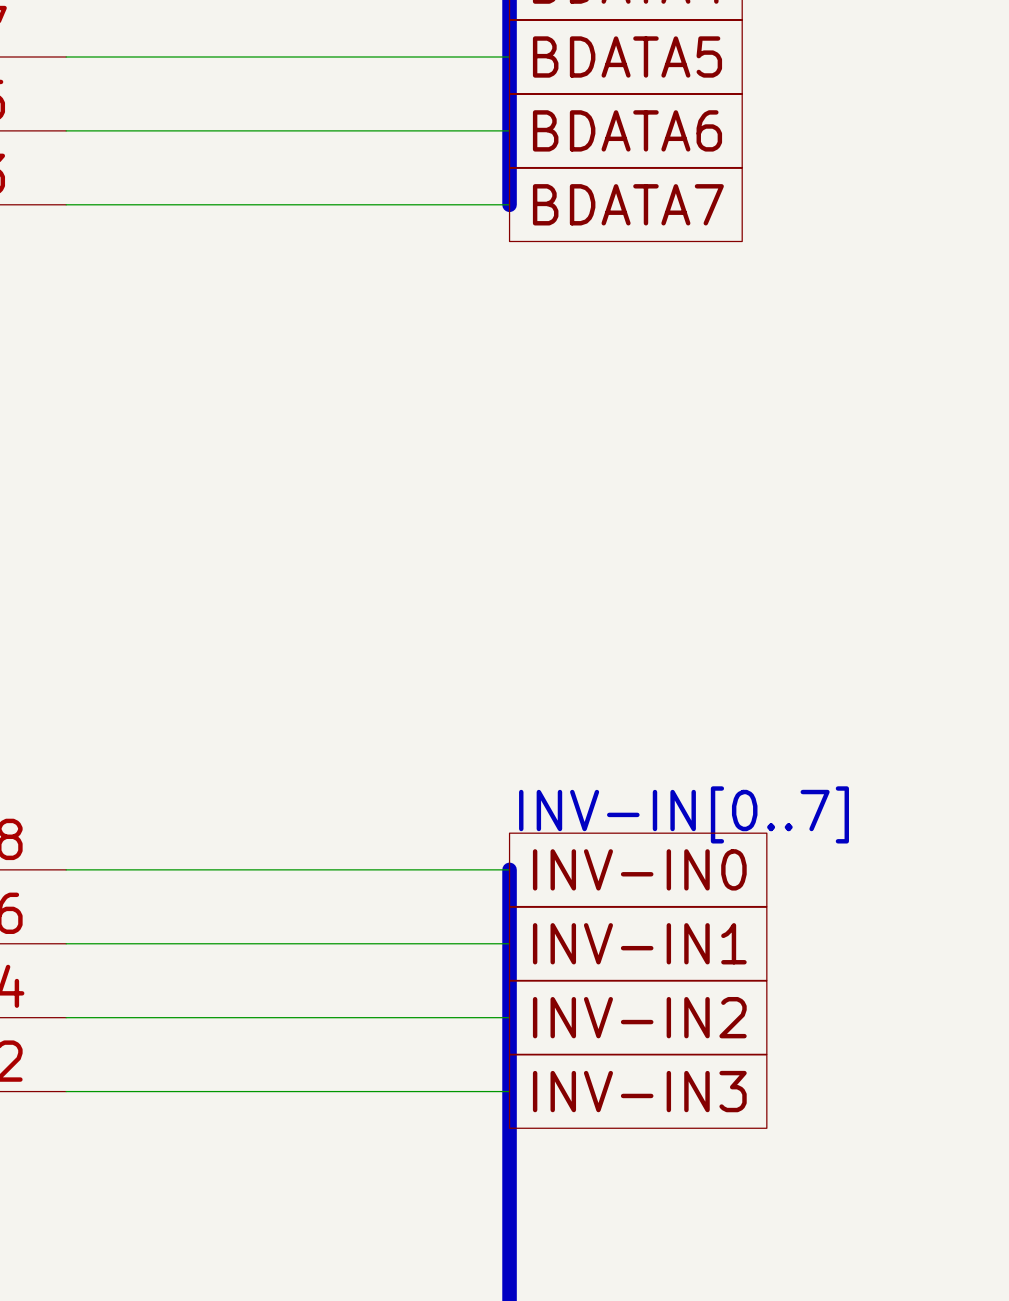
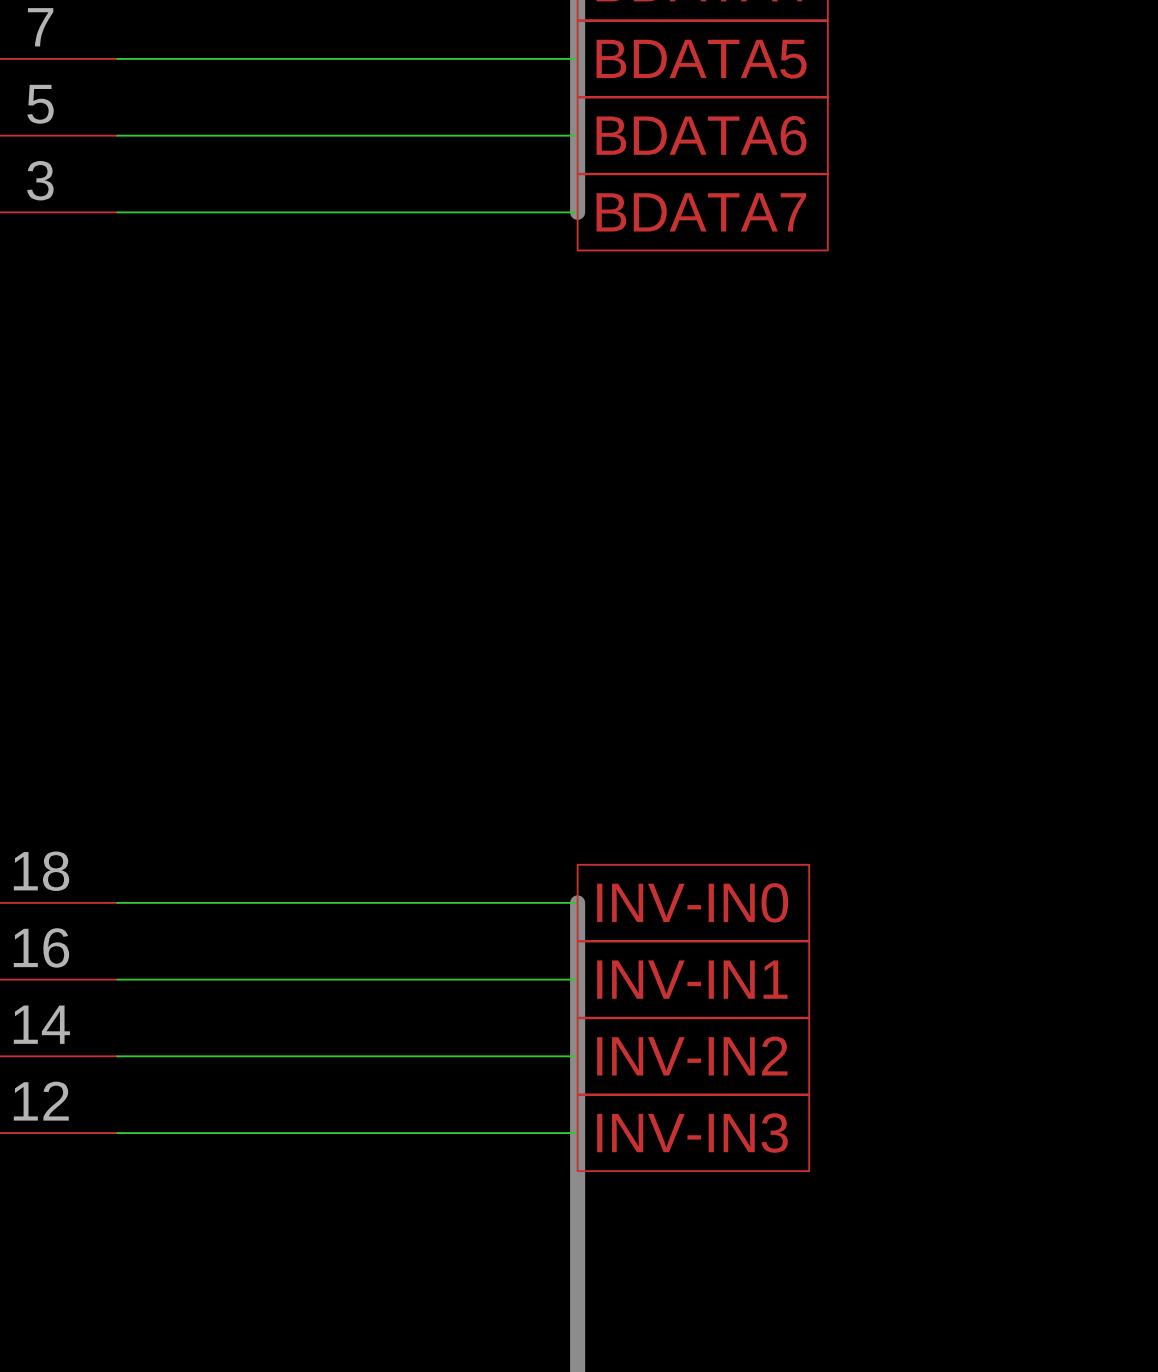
text: INV-IN[0..7] (684, 814) -> none

